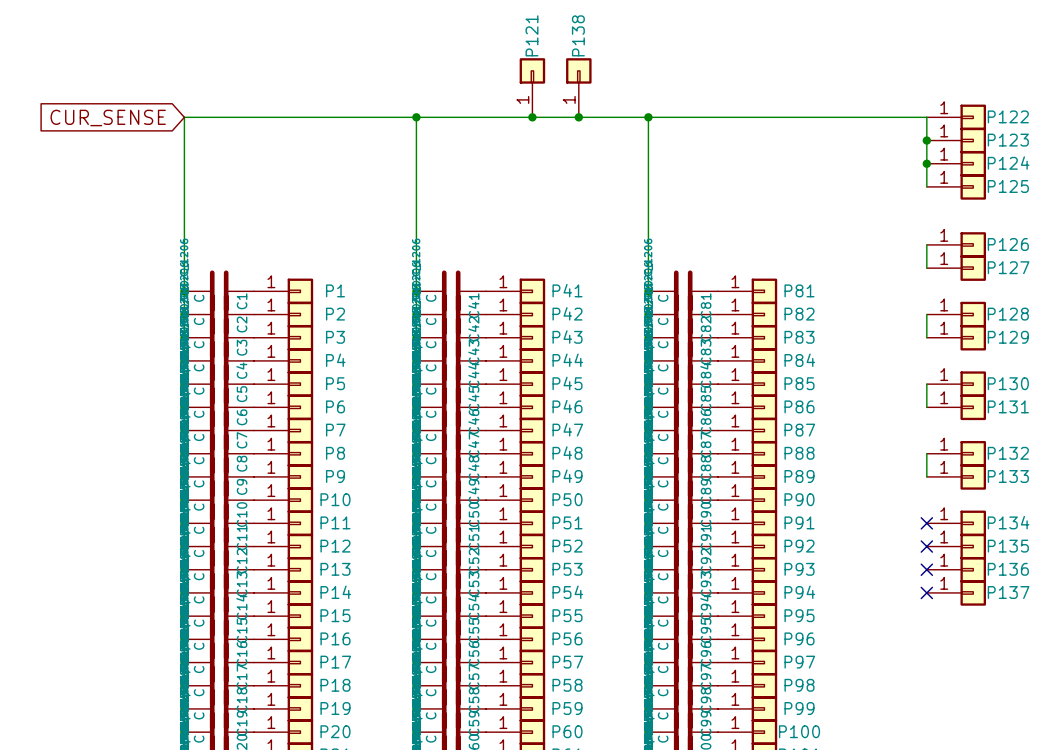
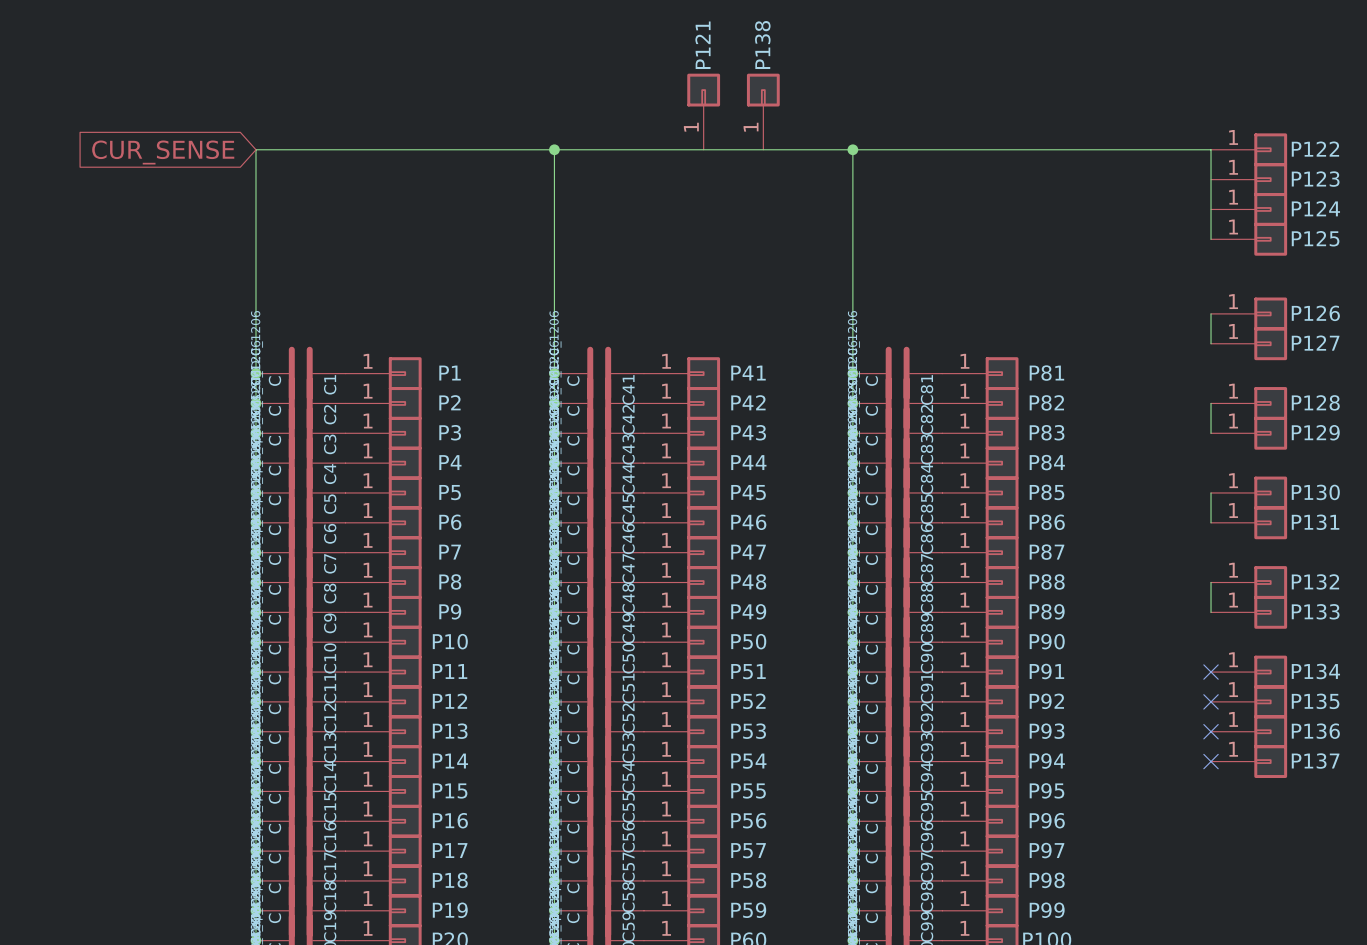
junction: (532, 117) -> none
junction: (578, 117) -> none
junction: (926, 140) -> none
junction: (926, 163) -> none

